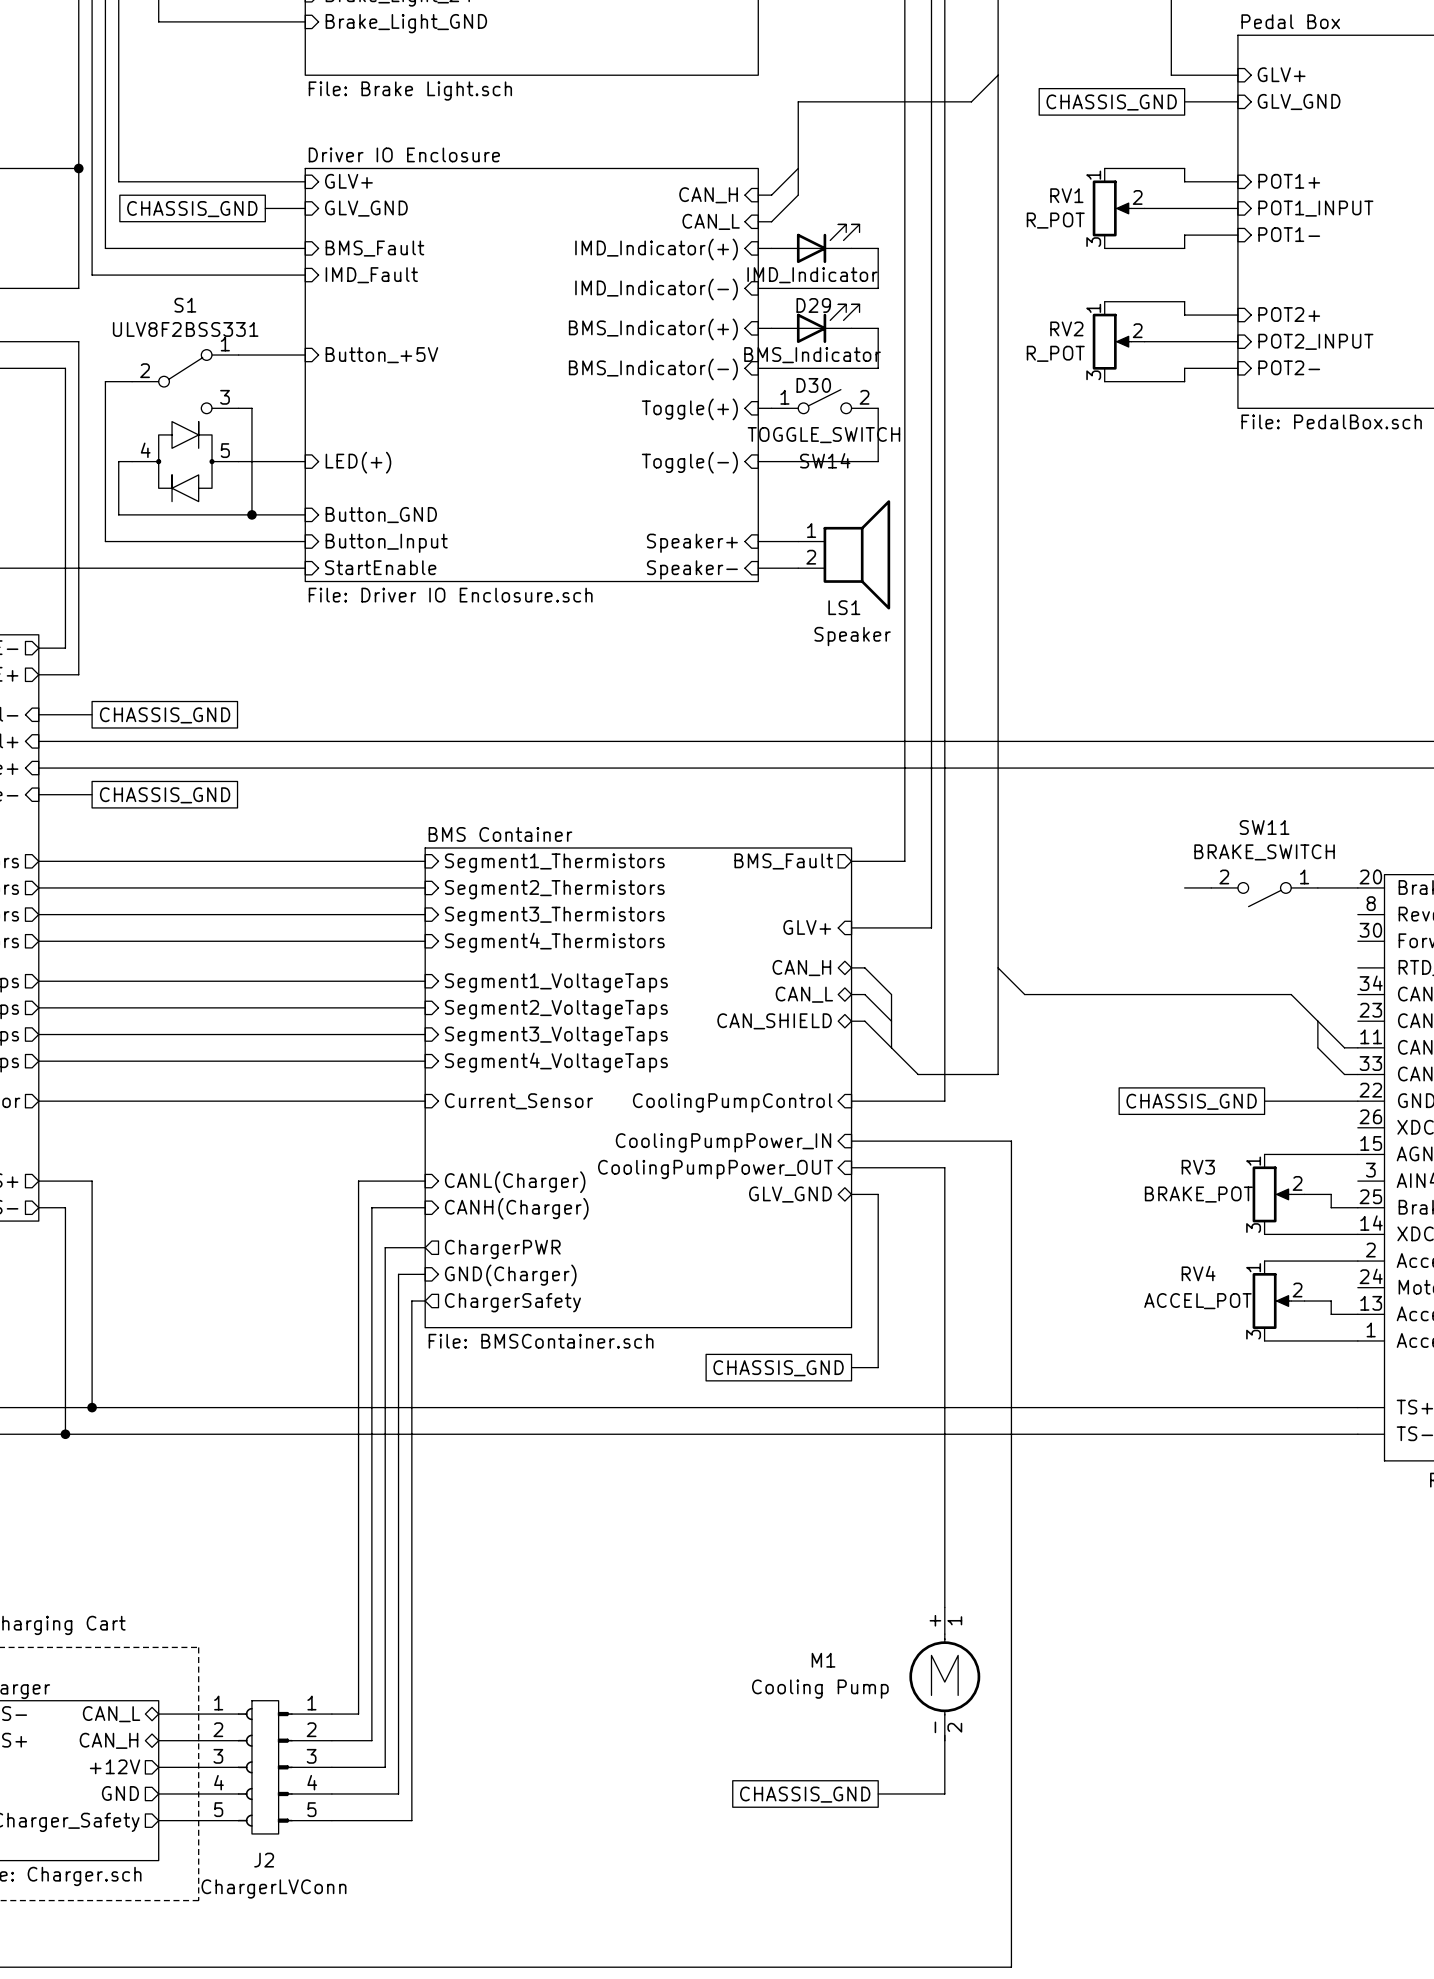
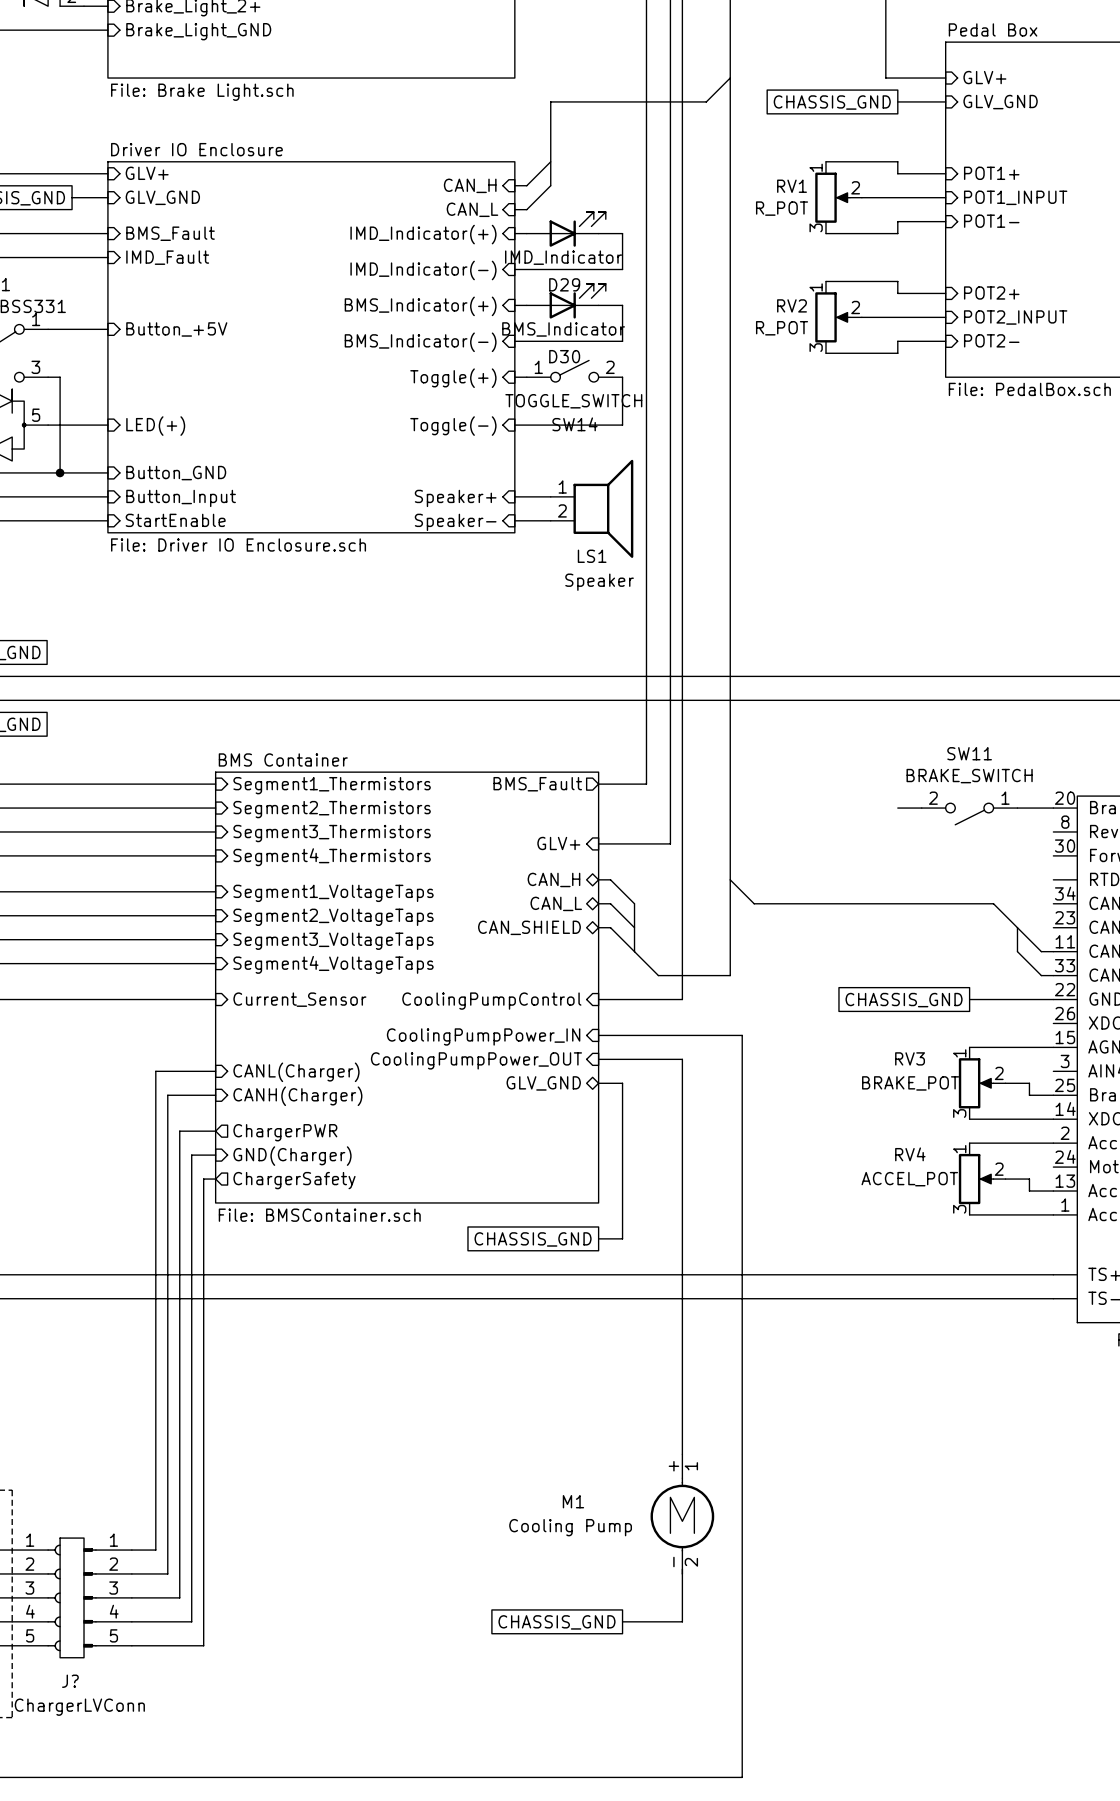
J2 name: J2 (264, 1860) -> J? (70, 1681)

